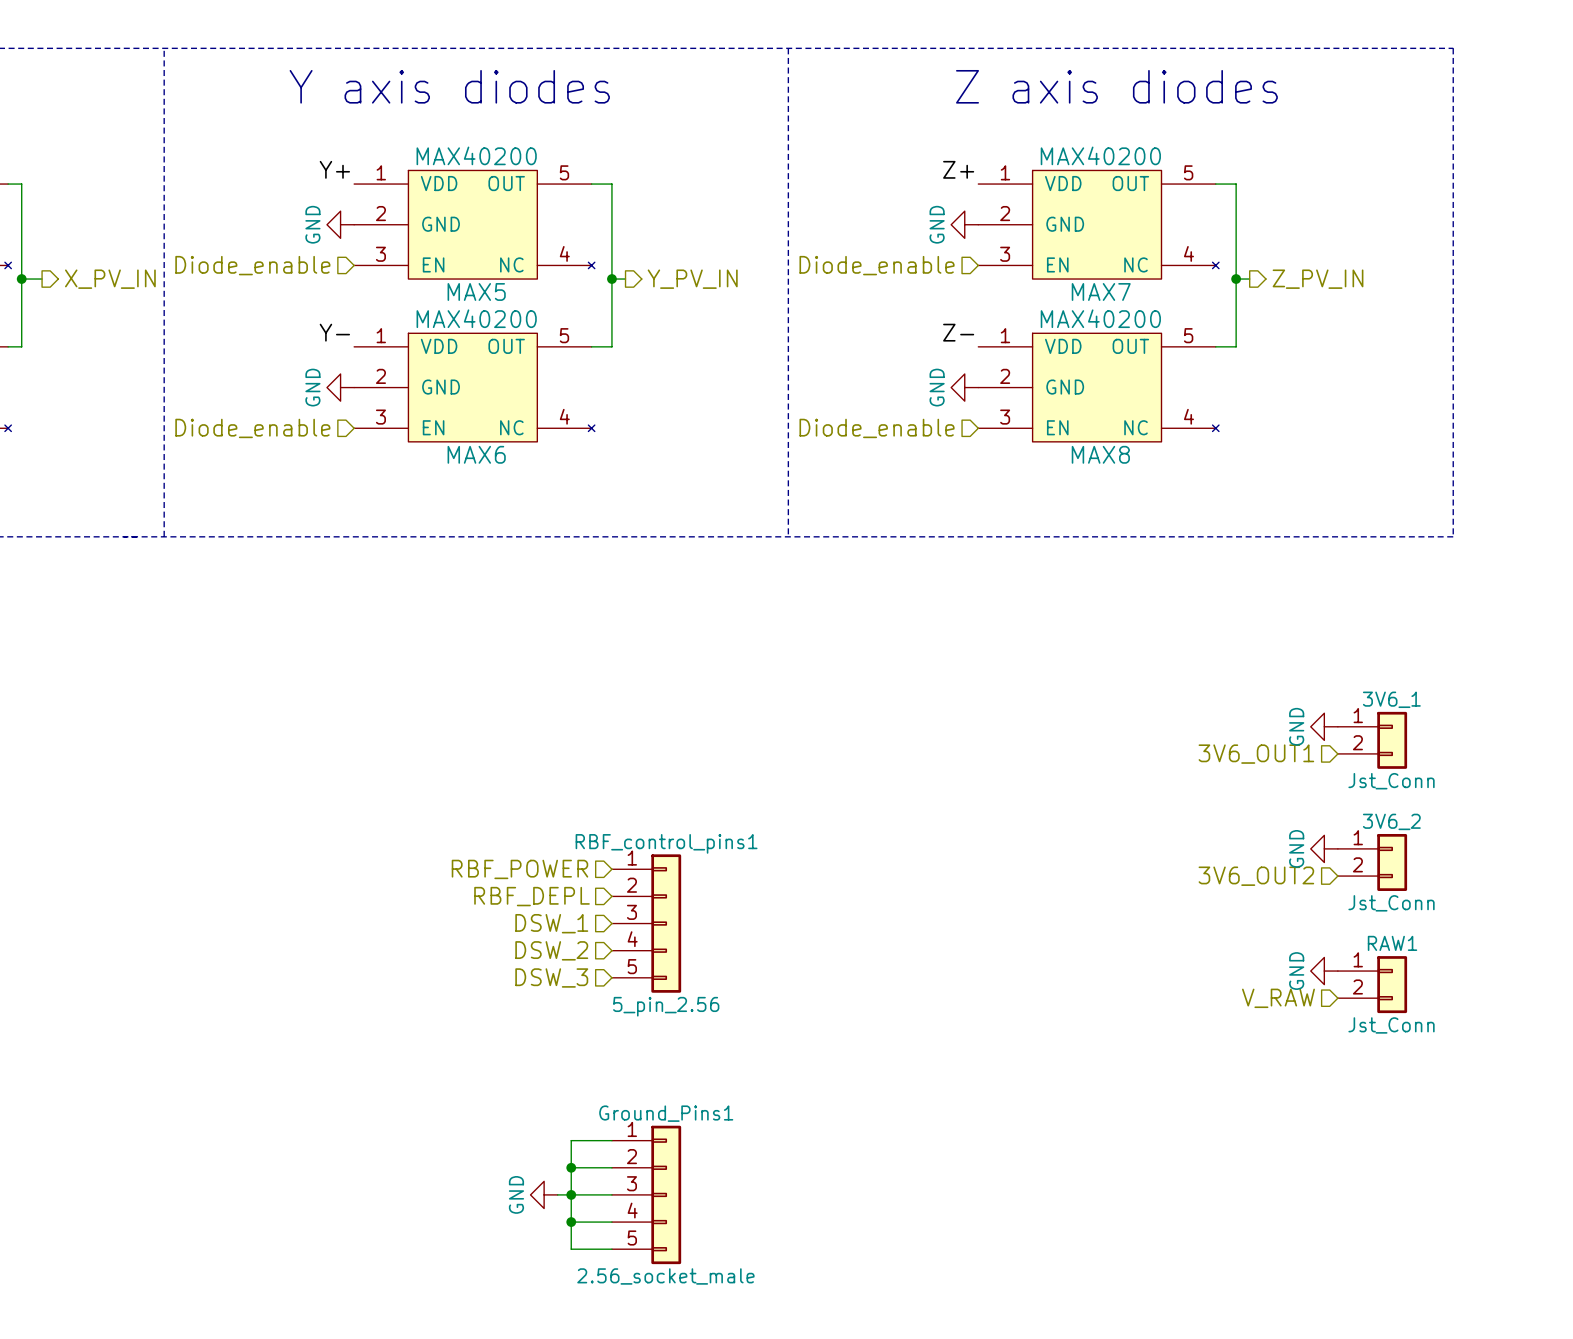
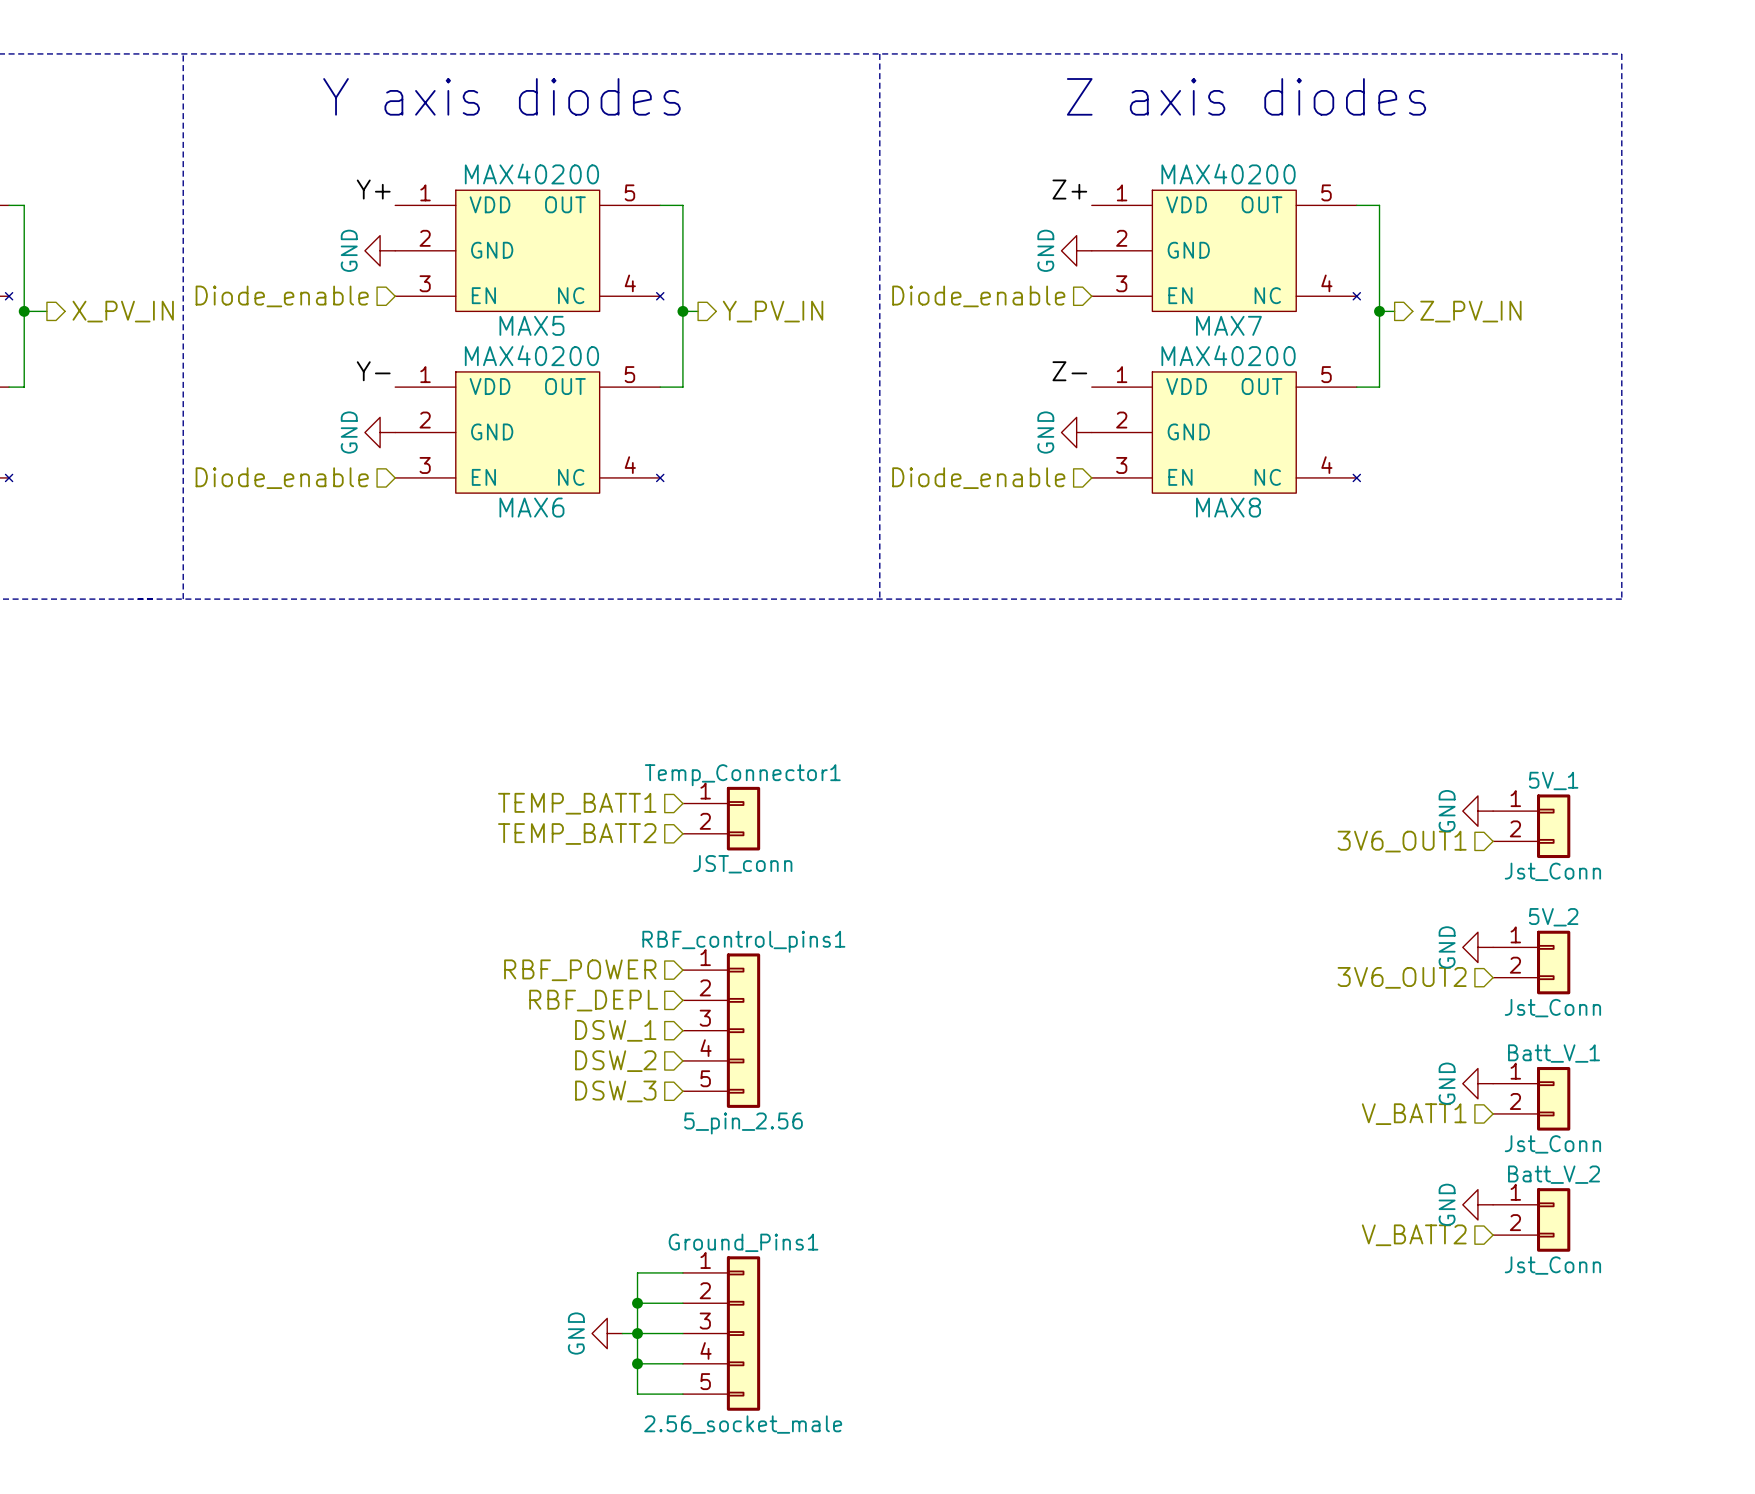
3V6_1 name: 3V6_1 (1391, 699) -> 5V_1 (1553, 780)
hierarchical label: none -> TEMP_BATT1 (577, 803)
Temp_Connector1: none -> JST_conn (721, 818)
hierarchical label: none -> TEMP_BATT2 (577, 834)
3V6_2 name: 3V6_2 (1391, 821) -> 5V_2 (1553, 917)
RAW1 name: RAW1 (1392, 943) -> Batt_V_1 (1554, 1053)
hierarchical label: V_RAW (1278, 998) -> V_BATT1 (1414, 1114)
power symbol: none -> GND (1477, 1204)
Batt_V_2: none -> Jst_Conn (1531, 1219)
hierarchical label: none -> V_BATT2 (1414, 1235)

